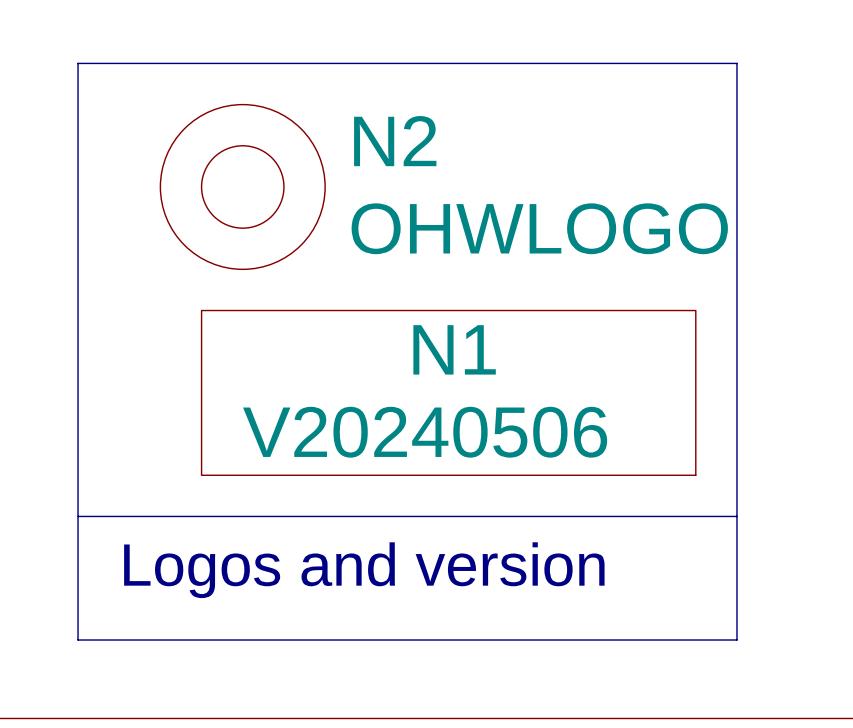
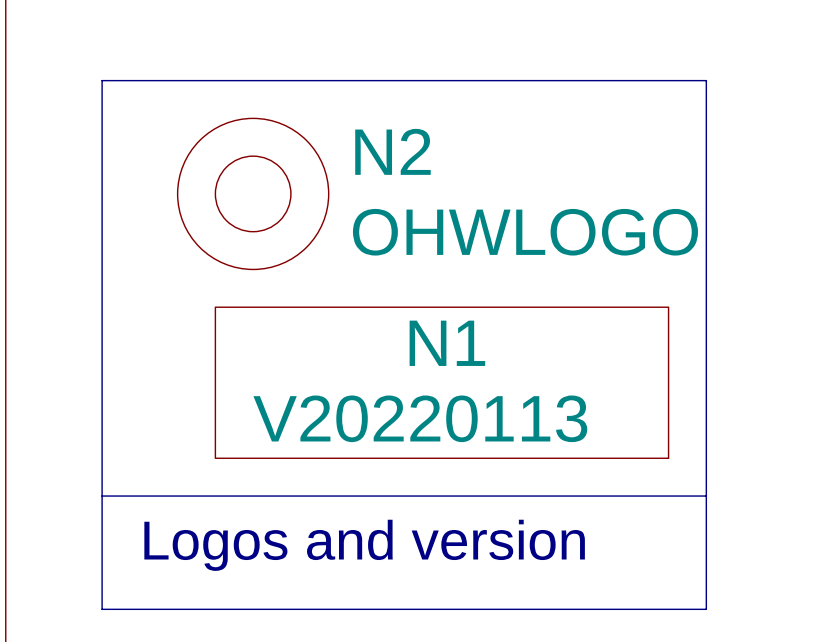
N1 value: V20240506 (425, 432) -> V20220113 (420, 418)

